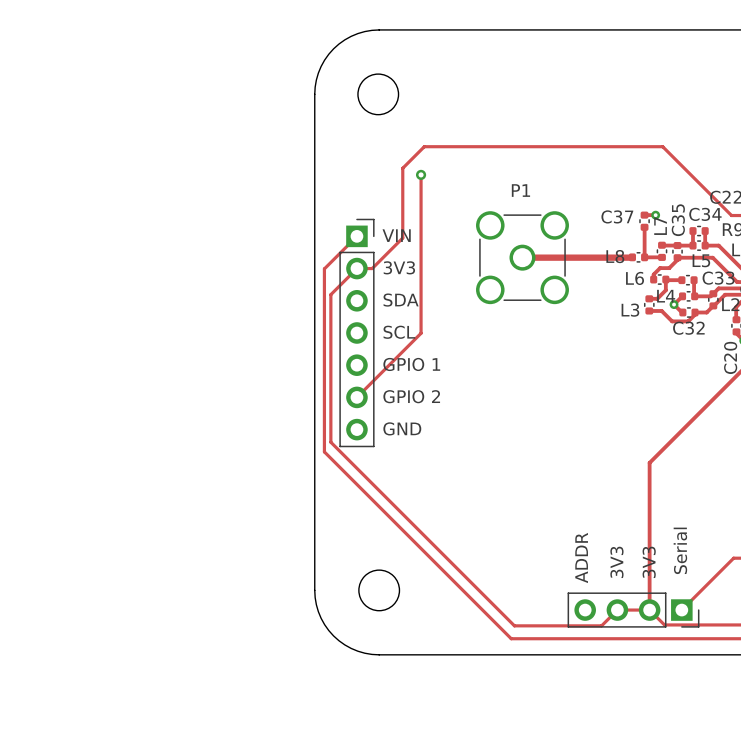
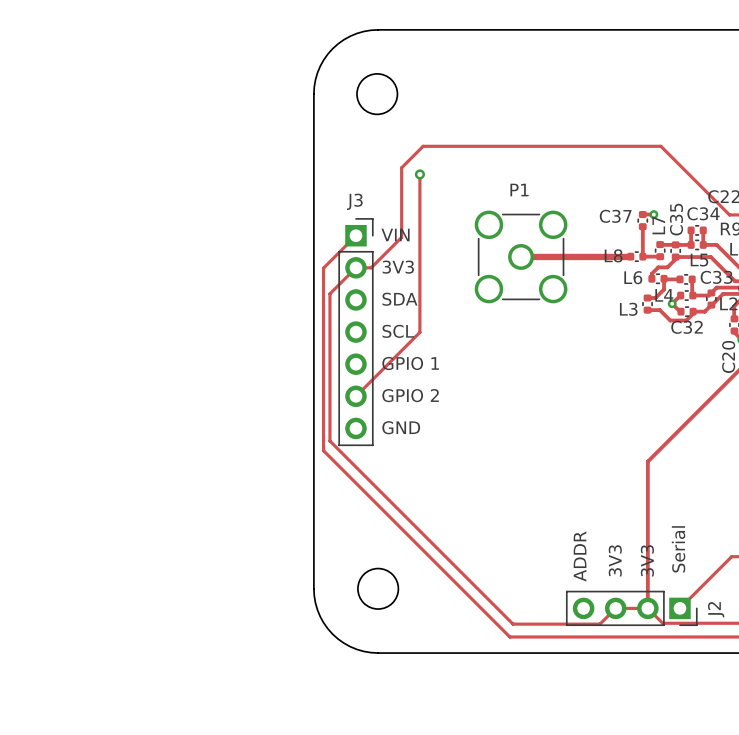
J3 name: none -> J3 (354, 201)
J2 name: none -> J2 (716, 609)

